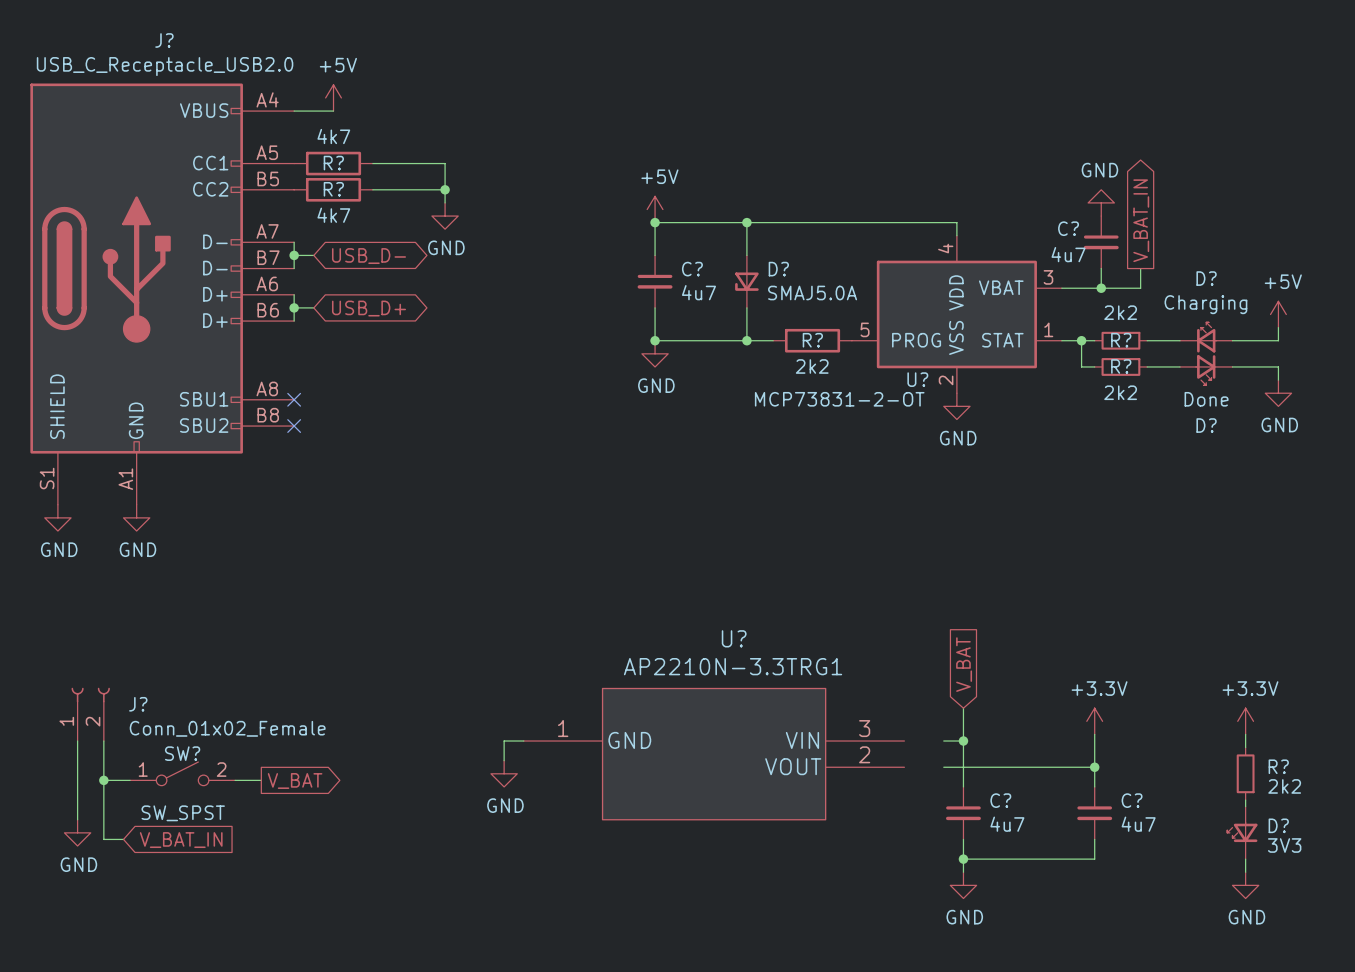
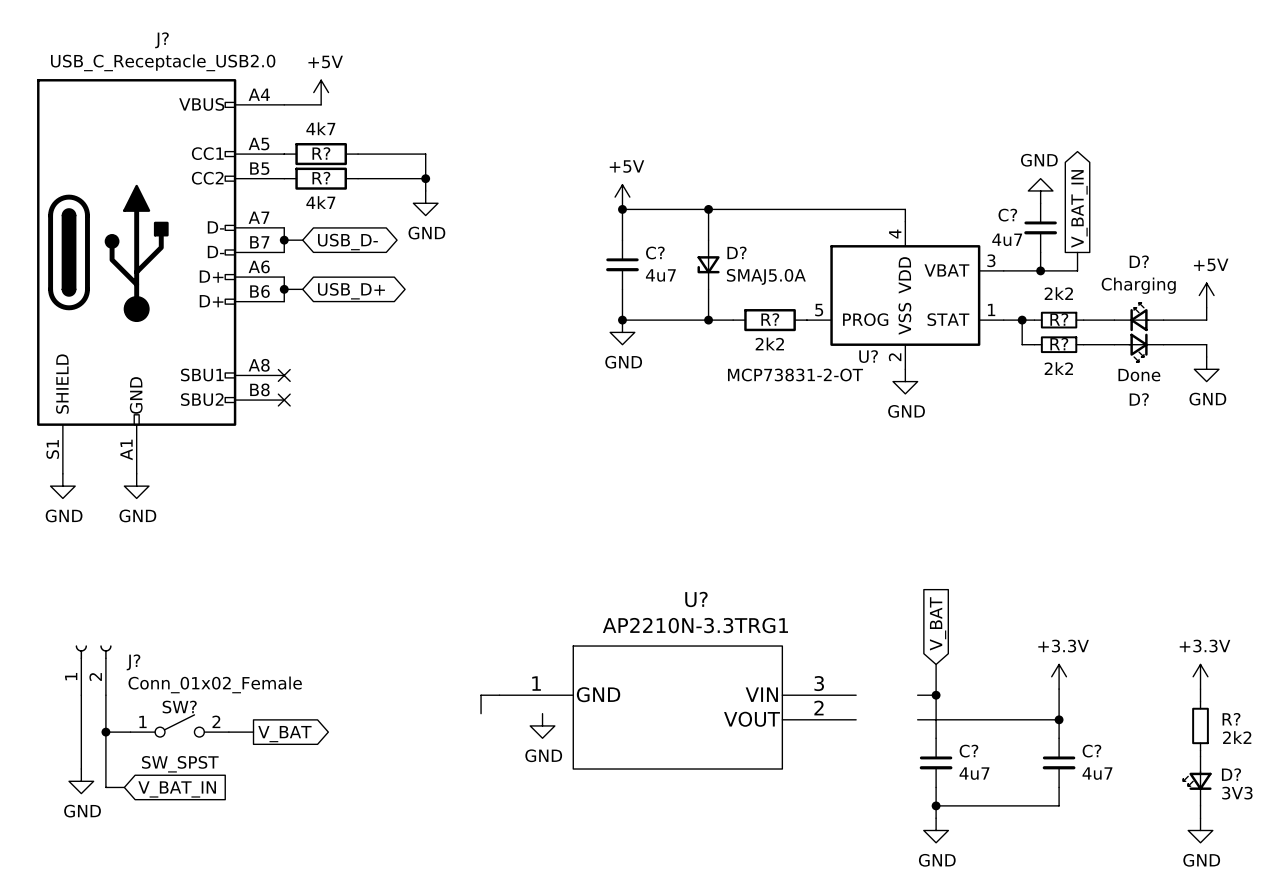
global label position: V_BAT (964, 664) -> V_BAT (938, 623)
wire: (963, 708) (963, 786) -> (936, 664) (936, 738)
power symbol position: +3.3V (1094, 721) -> +3.3V (1059, 676)
power symbol position: +3.3V (1245, 721) -> +3.3V (1200, 676)
wire: (1094, 734) (1094, 786) -> (1059, 689) (1059, 738)
wire: (1245, 734) (1245, 747) -> (1200, 689) (1200, 701)
wire: (943, 741) (963, 741) -> (917, 695) (936, 695)
junction position: (963, 741) -> (936, 695)
wire: (943, 767) (970, 767) -> (1034, 719) (1059, 719)
junction position: (1094, 767) -> (1059, 719)
power symbol position: GND (504, 773) -> GND (542, 725)
R? position: (1245, 773) -> (1200, 725)
wire: (1245, 800) (1245, 806) -> (1200, 750) (1200, 756)
C? position: (963, 813) -> (936, 762)
C? position: (1094, 813) -> (1059, 762)
D? position: (1242, 832) -> (1197, 781)
wire: (963, 839) (963, 872) -> (936, 787) (936, 818)
wire: (1094, 839) (1094, 859) -> (1059, 787) (1059, 805) (1034, 805)
wire: (963, 859) (989, 859) -> none
junction position: (963, 859) -> (936, 805)
wire: (1245, 859) (1245, 872) -> (1200, 805) (1200, 818)
power symbol position: GND (963, 885) -> GND (936, 830)
power symbol position: GND (1245, 885) -> GND (1200, 830)

